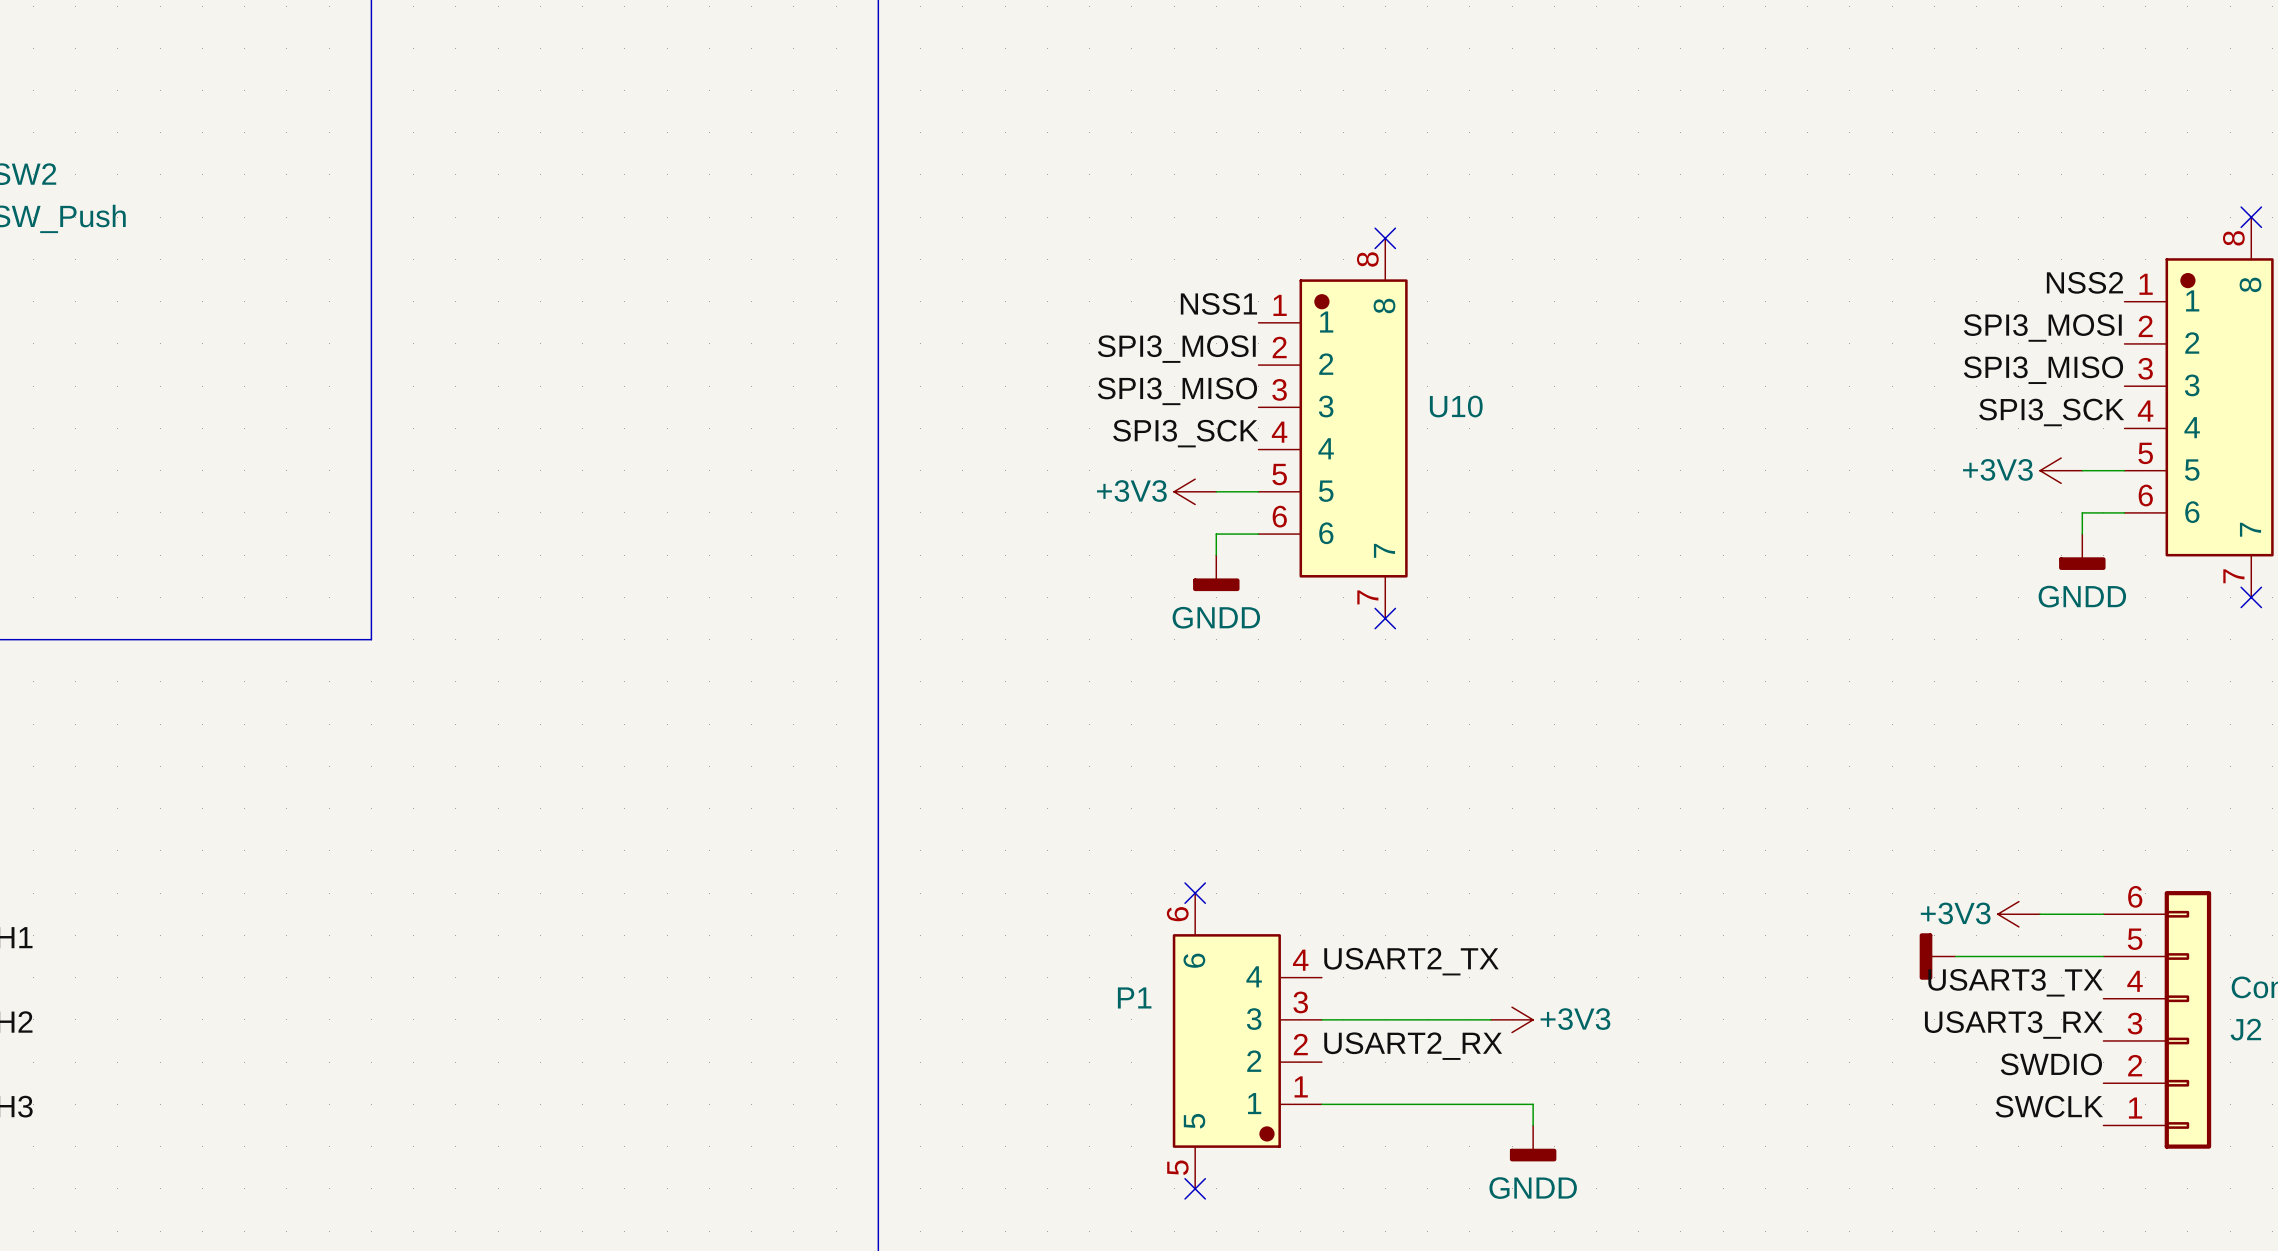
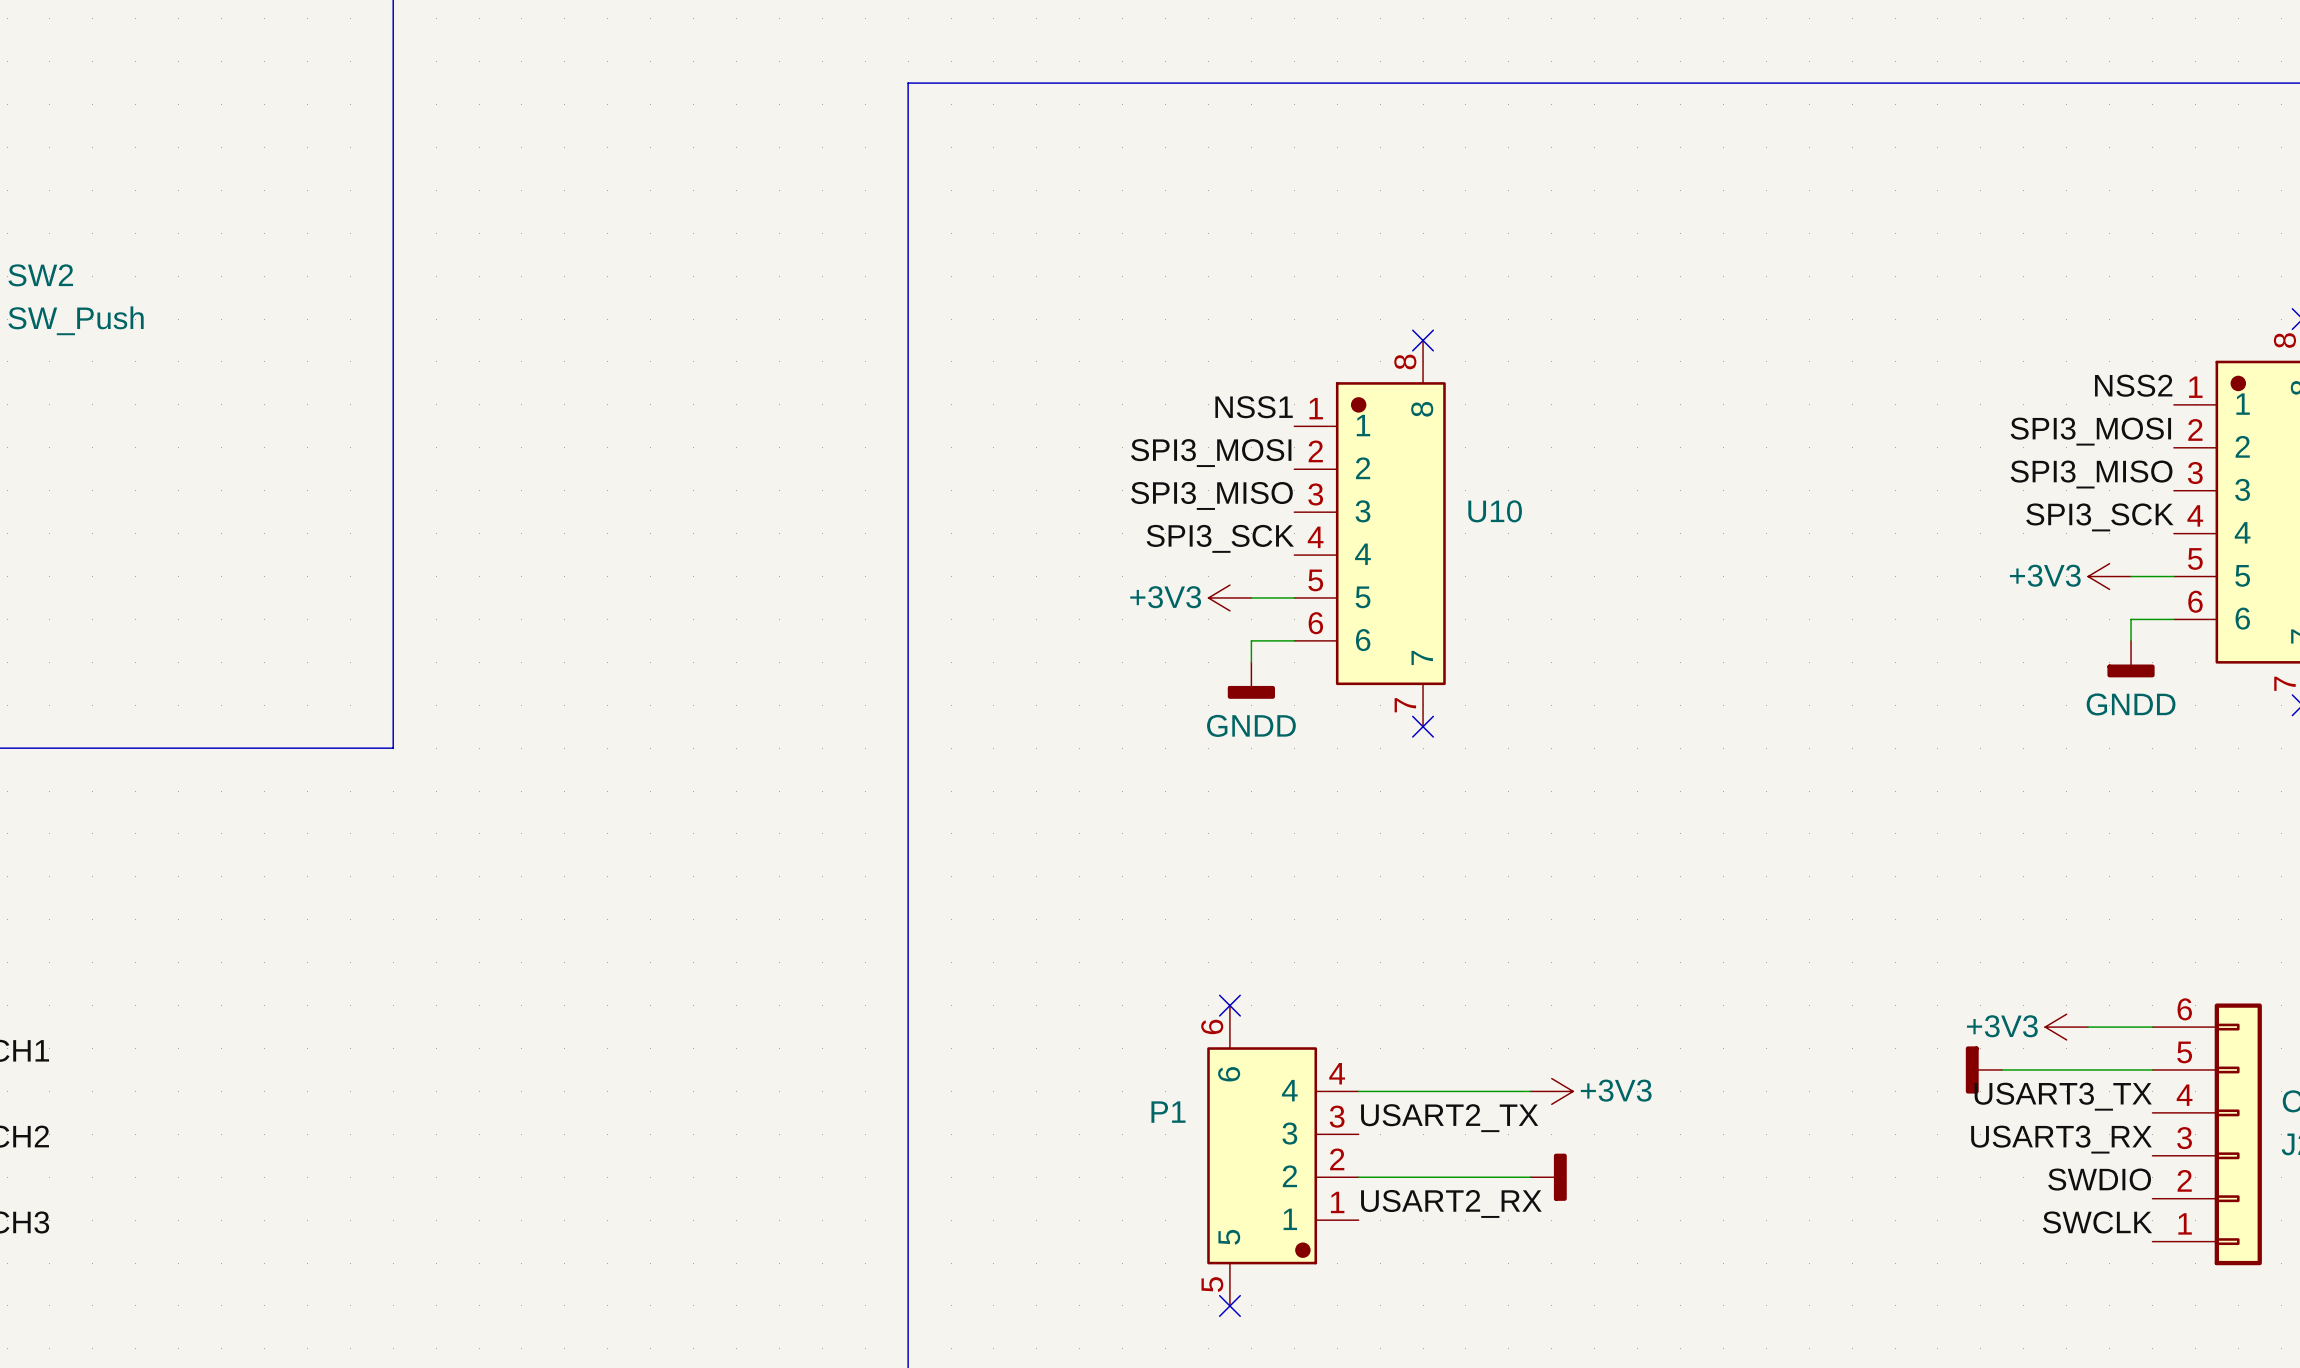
label position: USART2_TX (1411, 961) -> USART2_TX (1449, 1118)
wire: none -> (1358, 1091) (1530, 1091)
wire: (1321, 1019) (1490, 1019) -> (1358, 1177) (1530, 1177)
power symbol position: +3V3 (1512, 1019) -> +3V3 (1551, 1091)
label position: USART2_RX (1413, 1046) -> USART2_RX (1451, 1203)
power symbol: none -> (1548, 1177)
wire: (1321, 1104) (1533, 1104) (1533, 1125) -> none
power symbol: GNDD (1533, 1143) -> none

